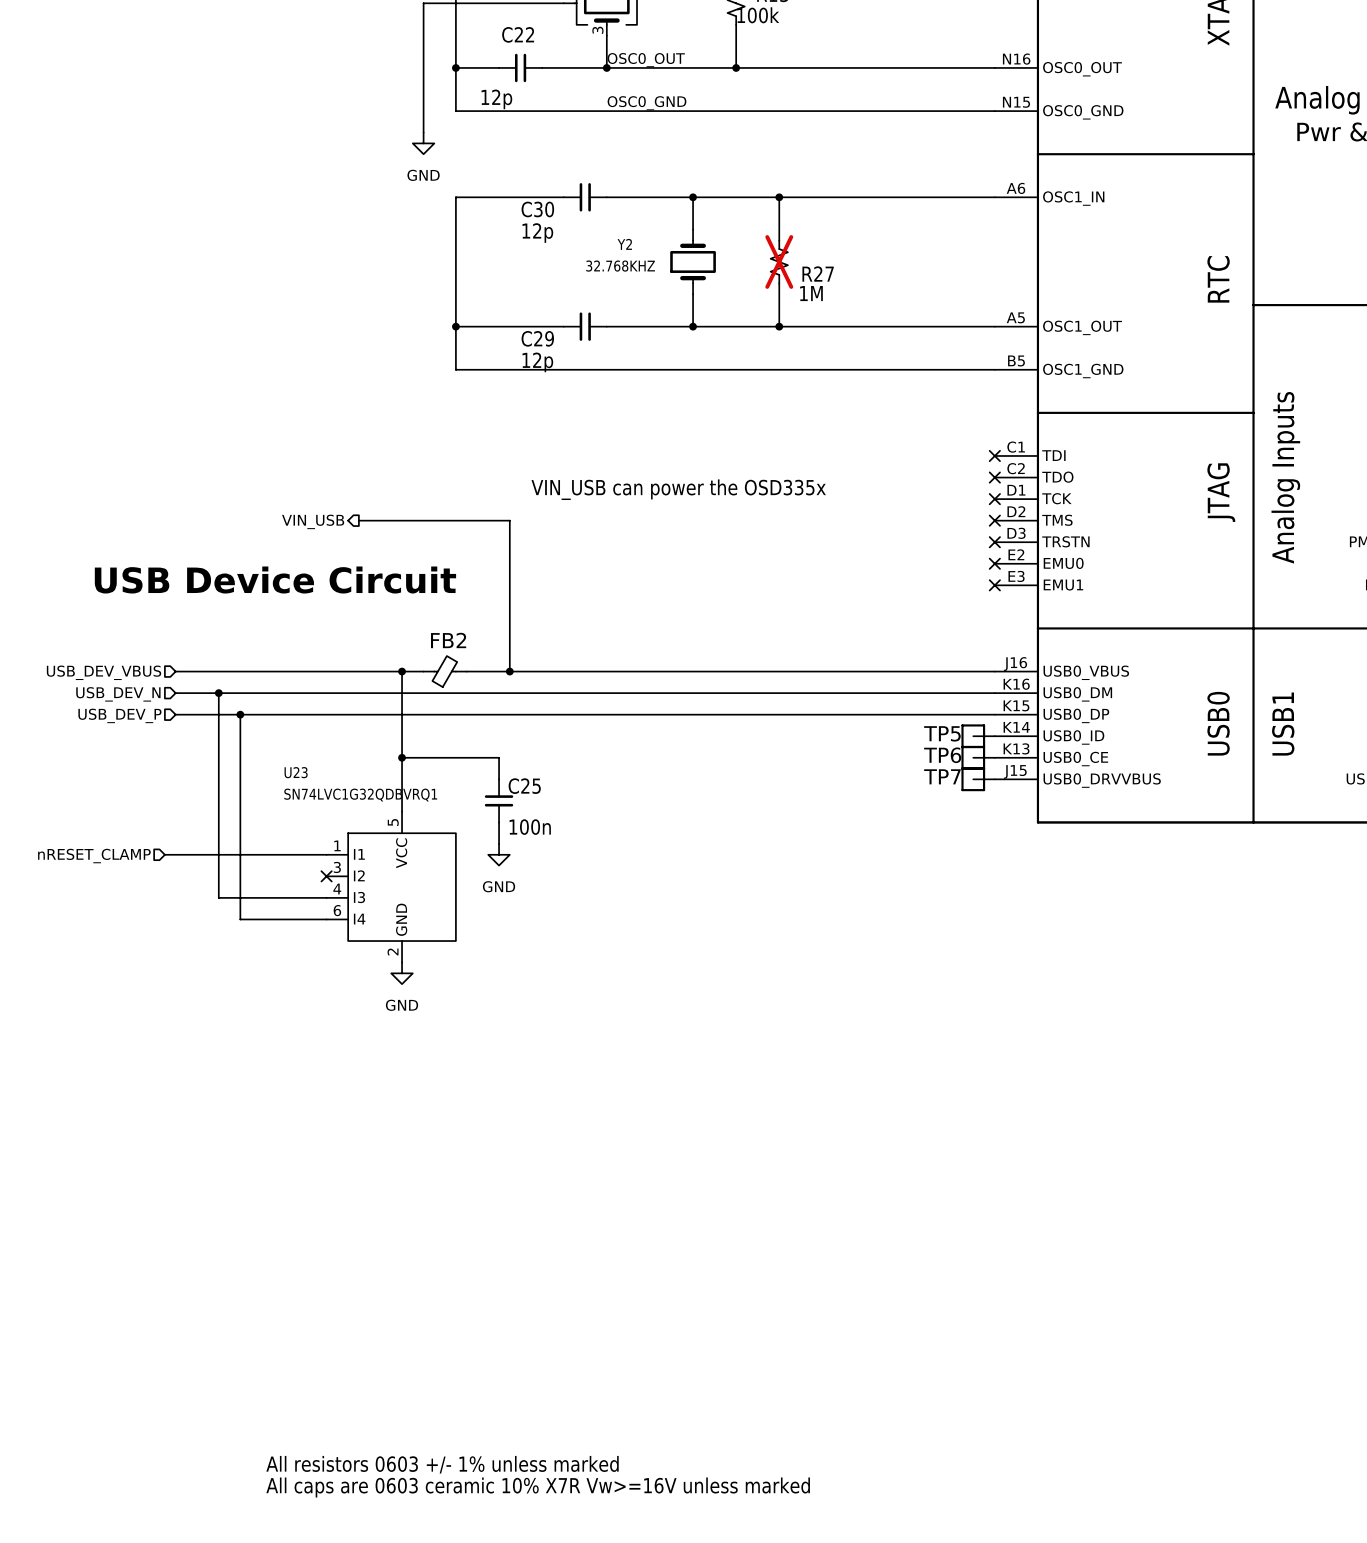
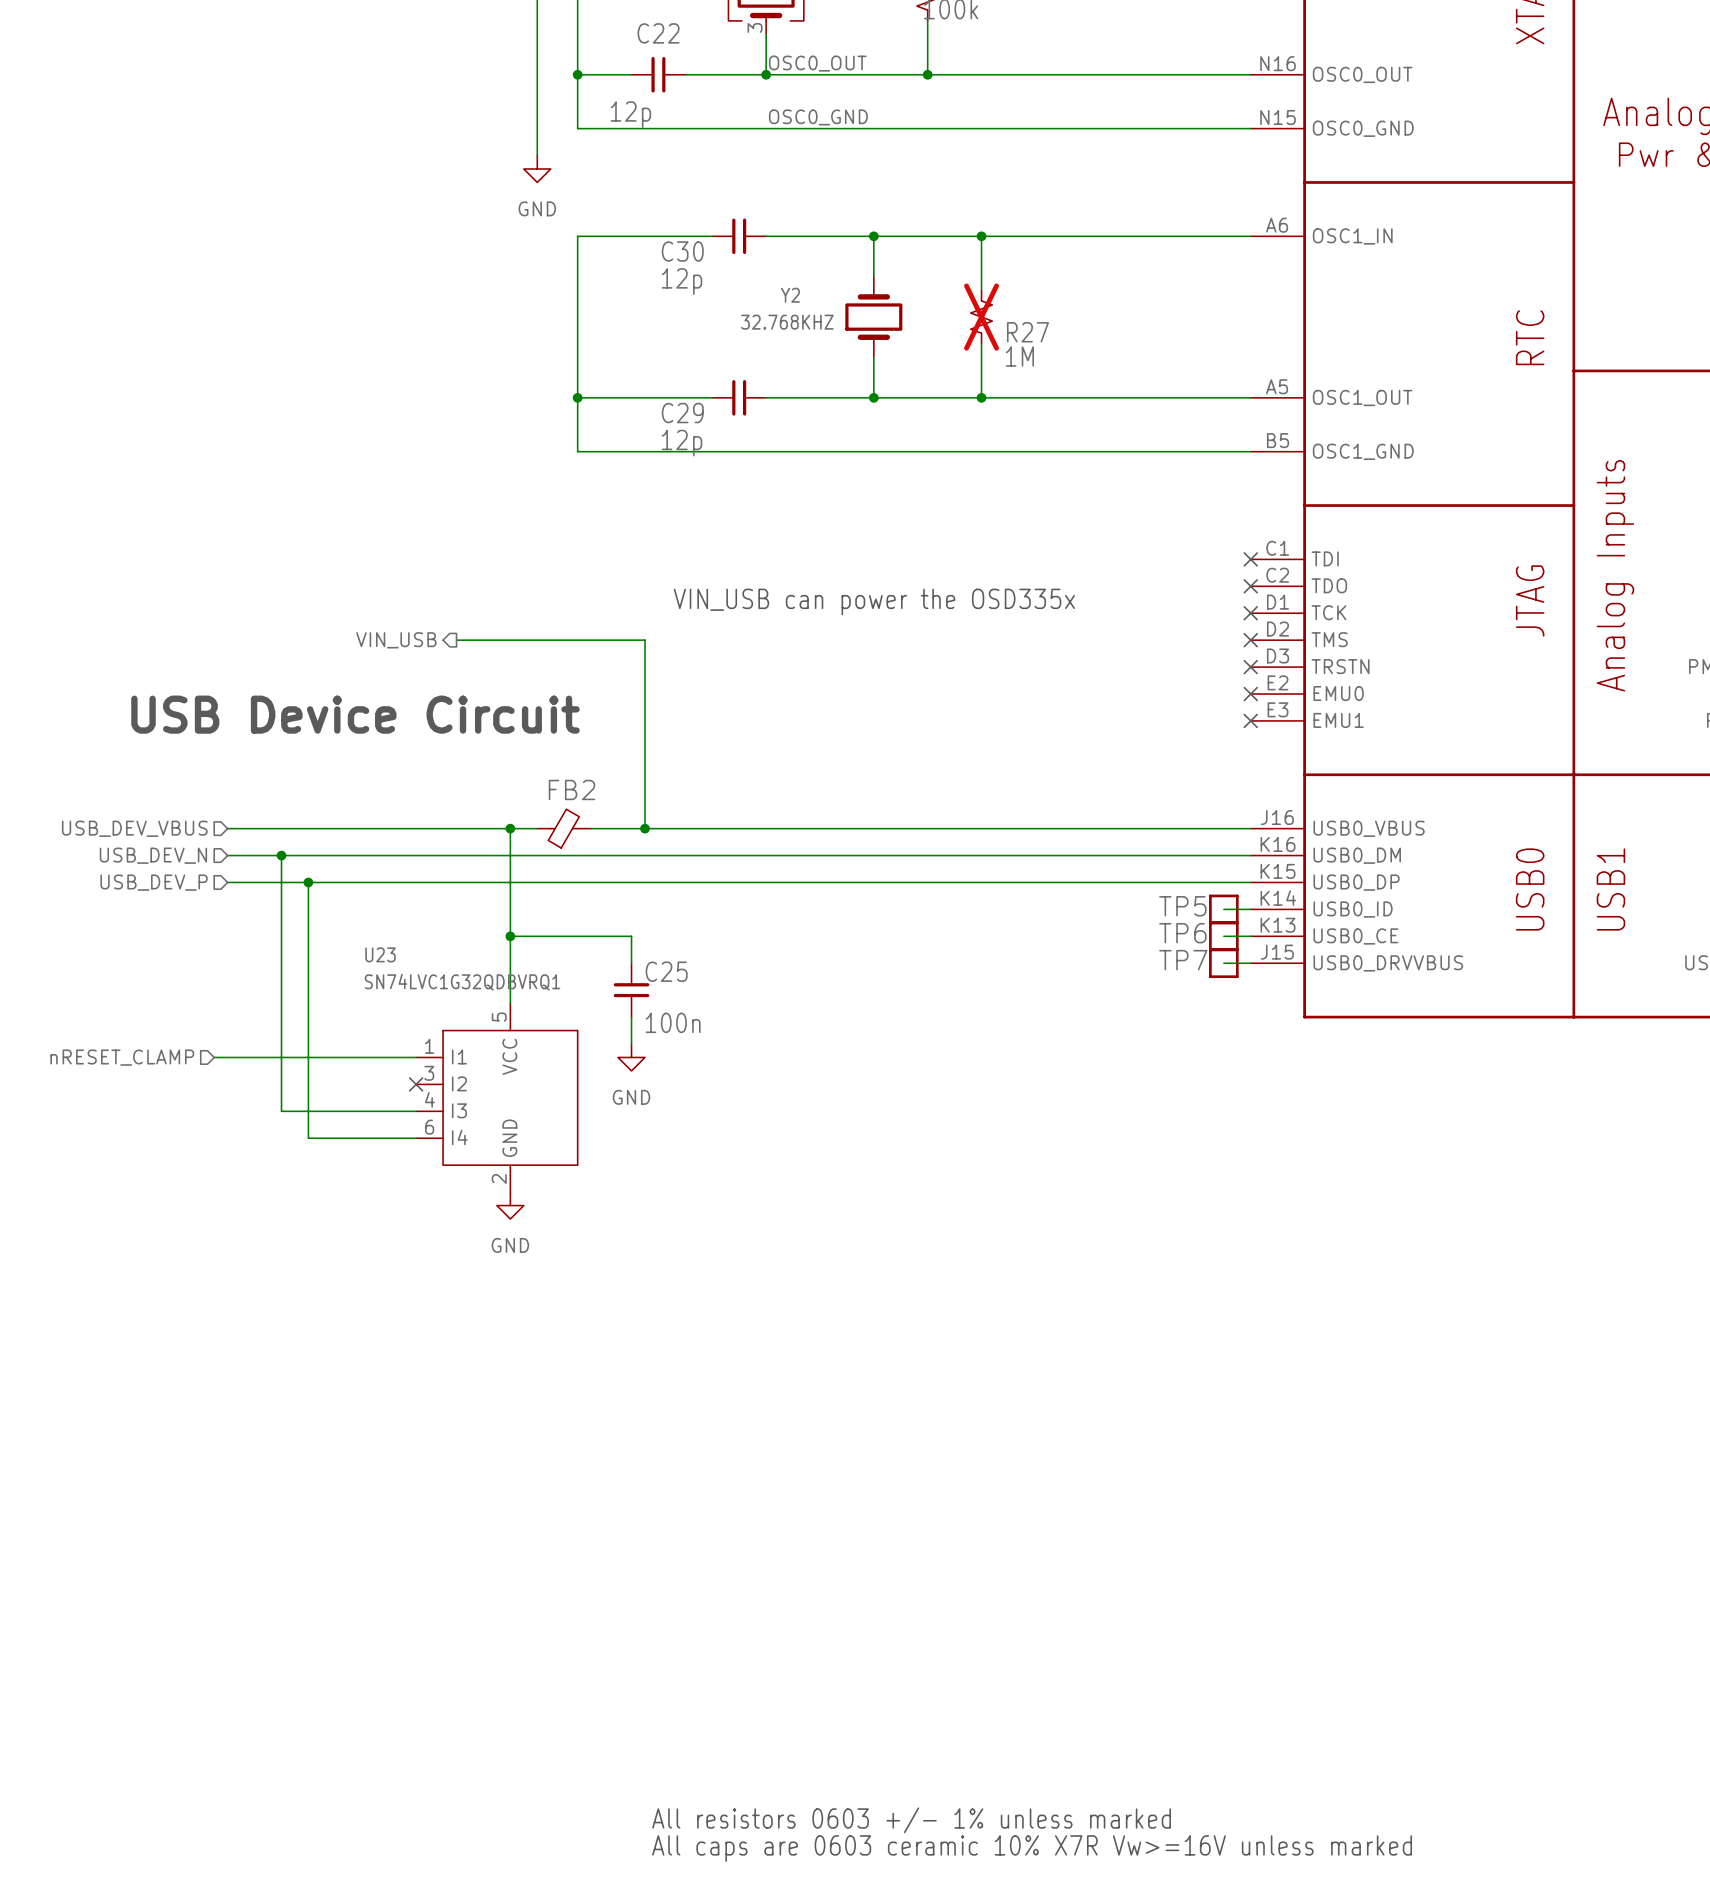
text: All resistors 0603 +/- 1% unless marked (442, 1464) -> none
text: none -> All resistors 0603 +/- 1% unless marked (911, 1820)
text: All caps are 0603 ceramic 10% X7R Vw>=16V unless marked (538, 1487) -> none
text: none -> All caps are 0603 ceramic 10% X7R Vw>=16V unless marked (1032, 1848)

